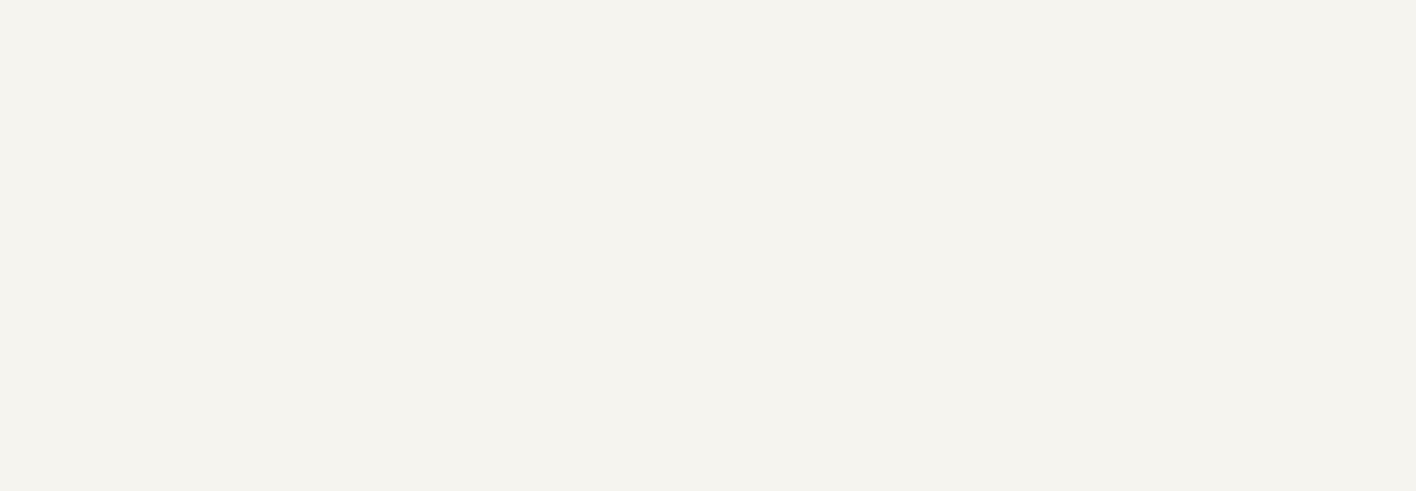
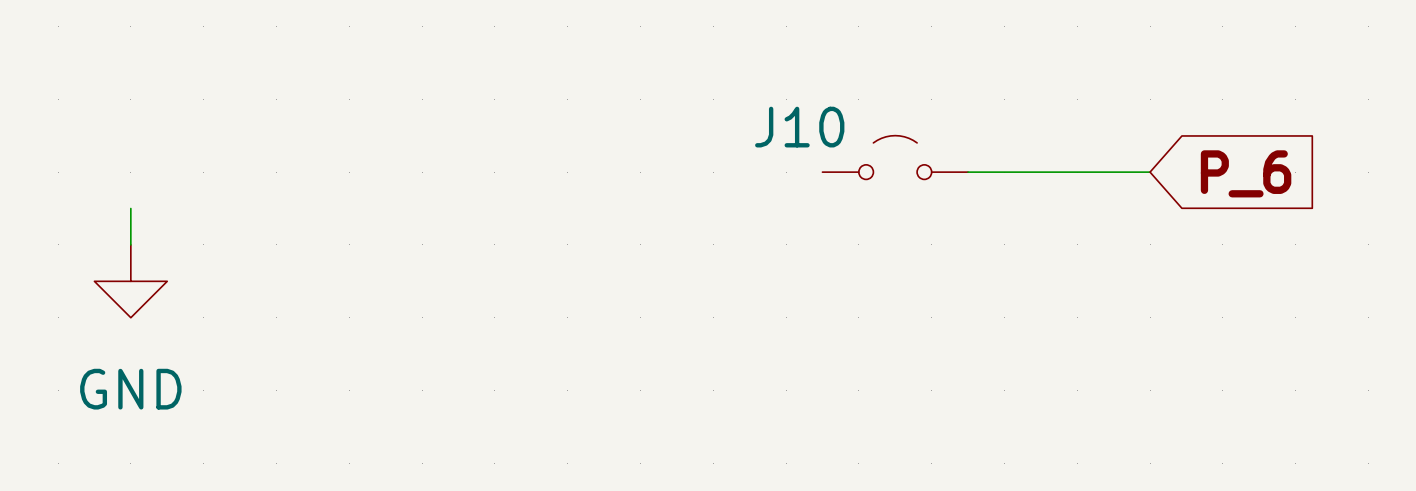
J10: none -> (895, 157)
wire: none -> (968, 172) (1150, 172)
global label: none -> P_6 (1246, 173)
wire: none -> (130, 208) (130, 244)
power symbol: none -> GND (130, 281)

